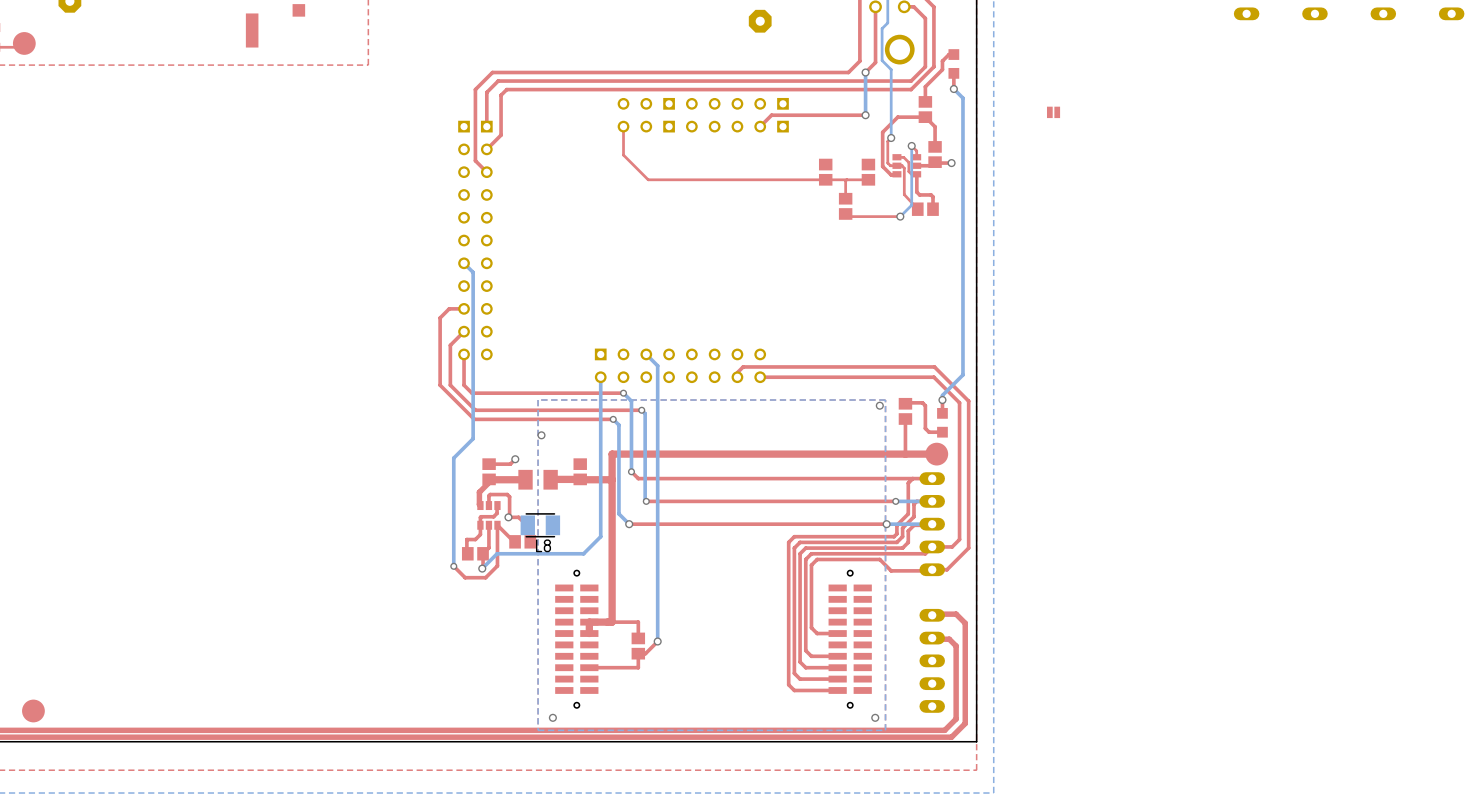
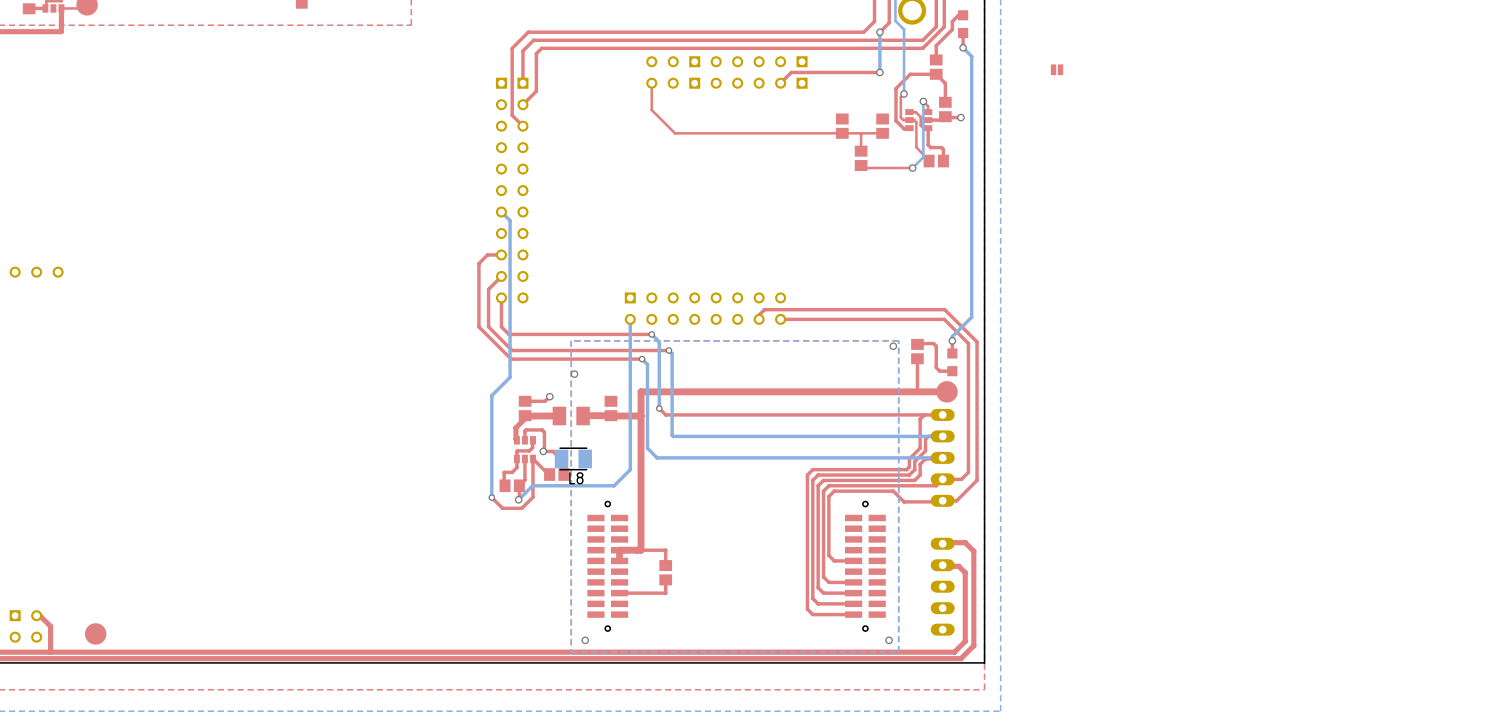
bottom track: (646, 354) (657, 365) (657, 641) -> none
via: (646, 501) -> none
top track: (895, 501) (646, 501) -> none
bottom track: none -> (908, 436) (673, 436)
via: (895, 501) -> none
via: (629, 524) -> none
top track: (886, 524) (629, 524) -> none
bottom track: none -> (899, 457) (657, 457)
via: (886, 524) -> none
top track: (657, 641) (645, 653) (638, 653) -> none
via: (657, 641) -> none

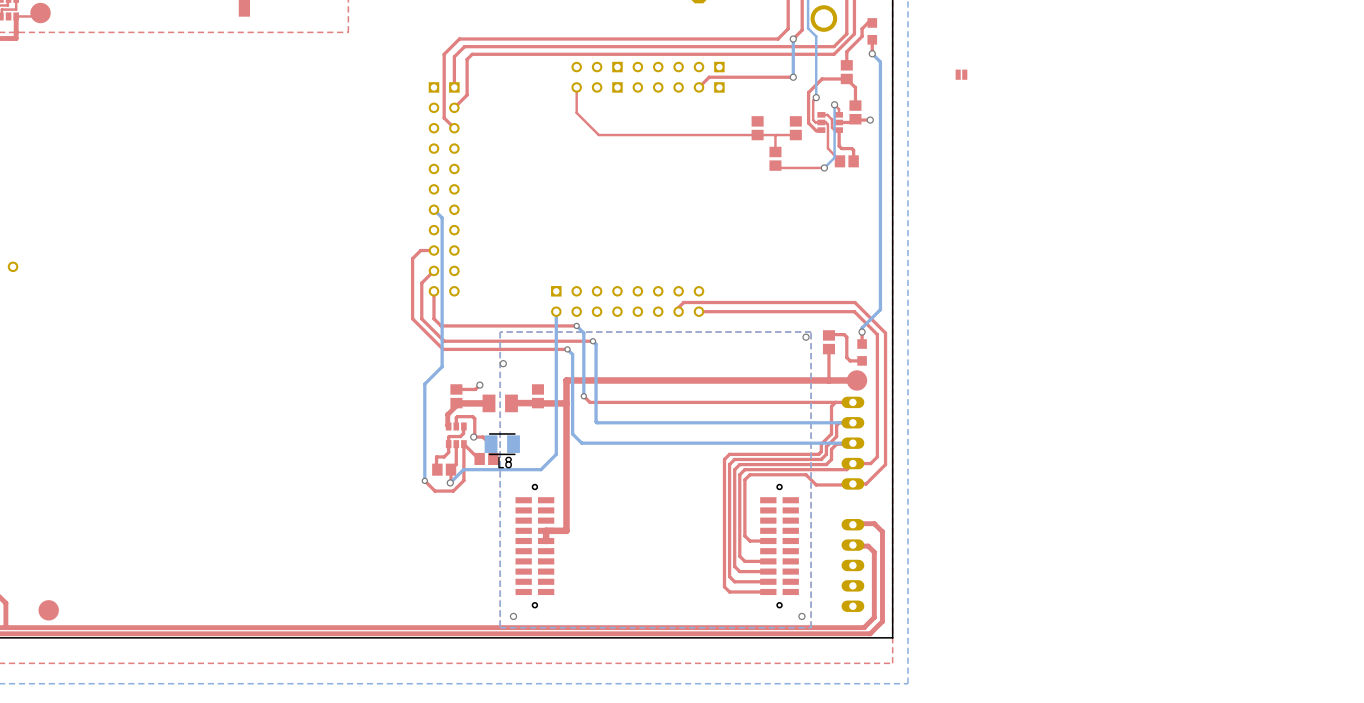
top track: (636, 550) (665, 550) (665, 565) -> none
part: (665, 572) -> none
top track: (665, 579) (665, 593) (619, 593) -> none

